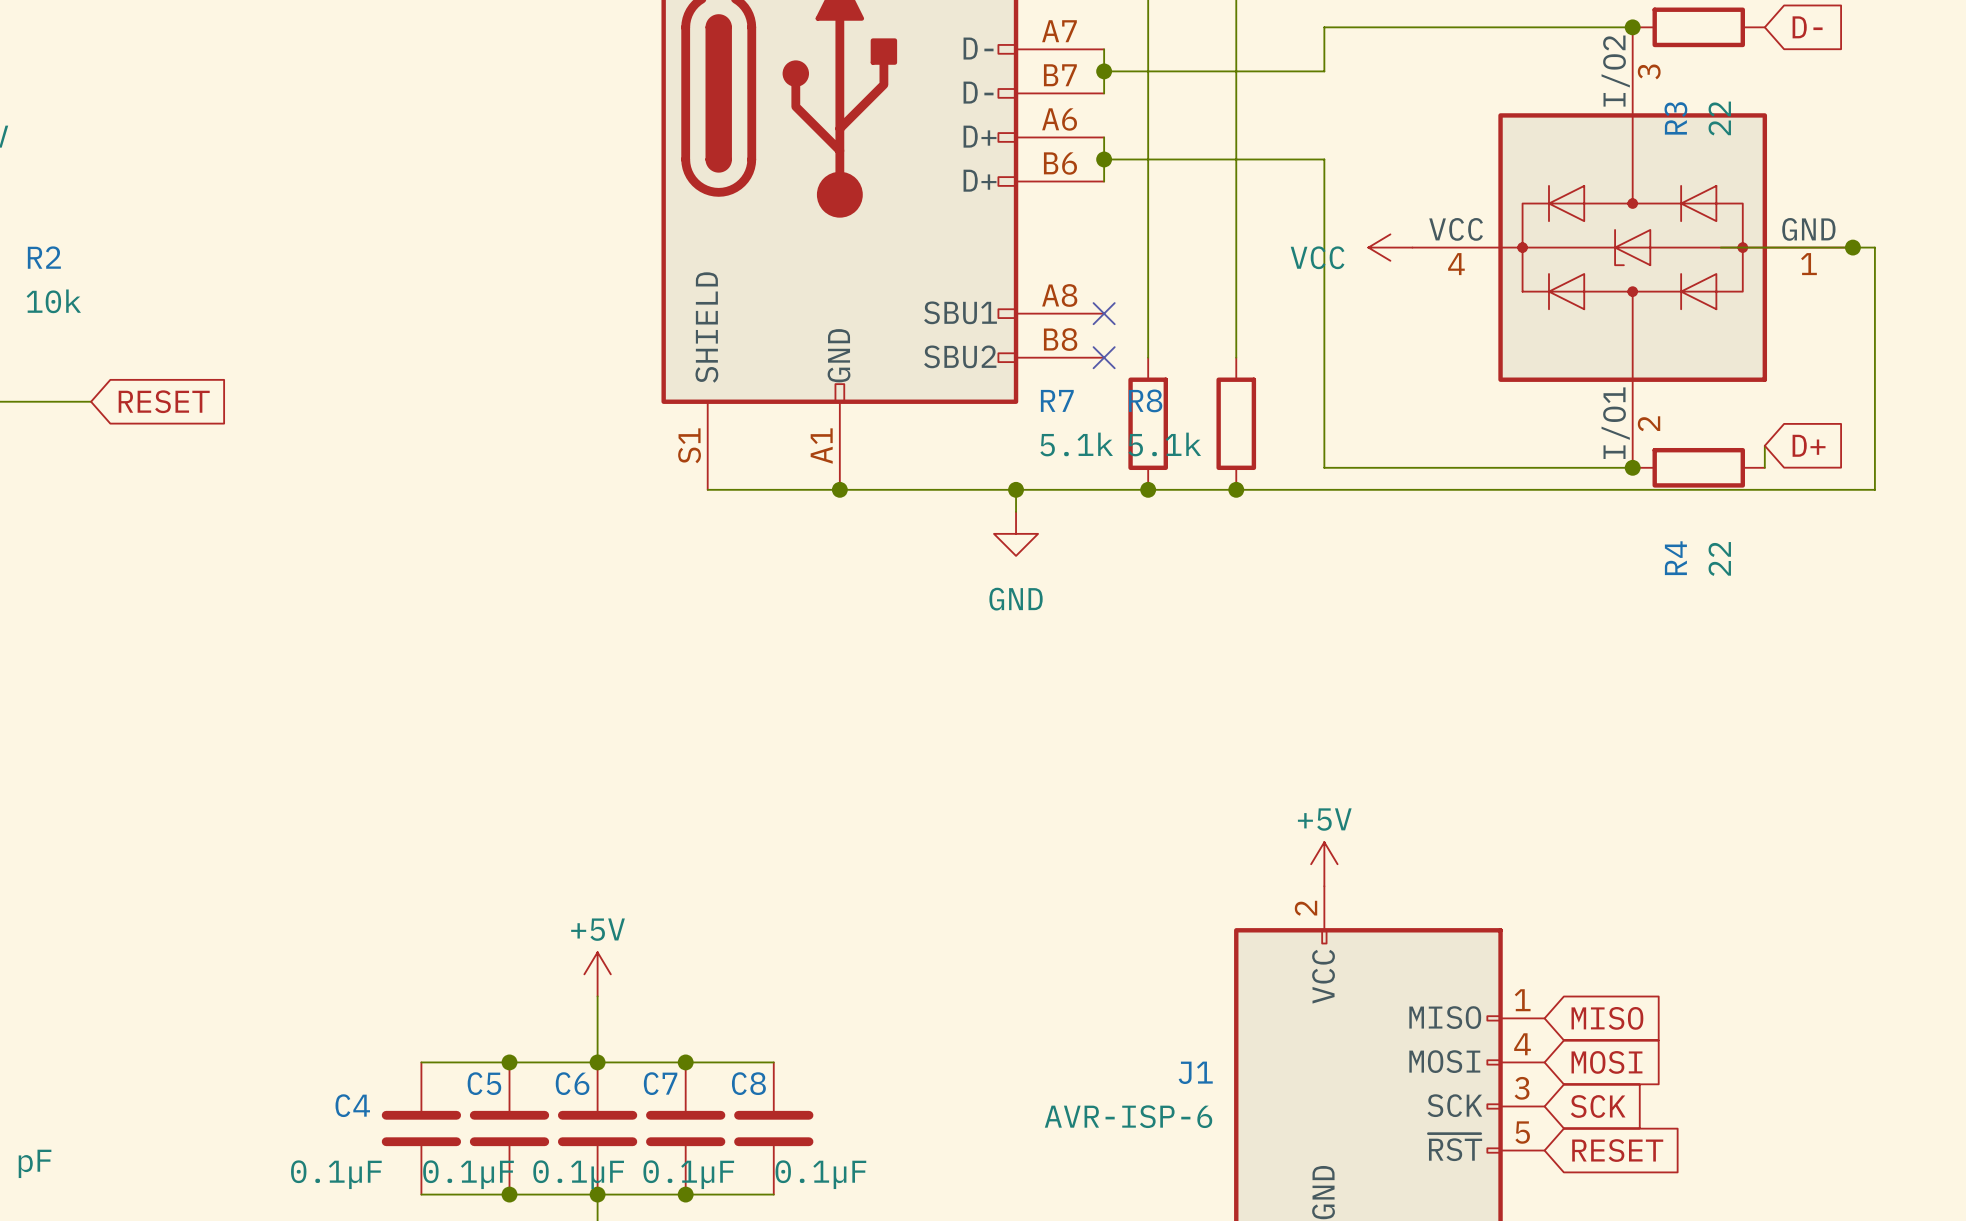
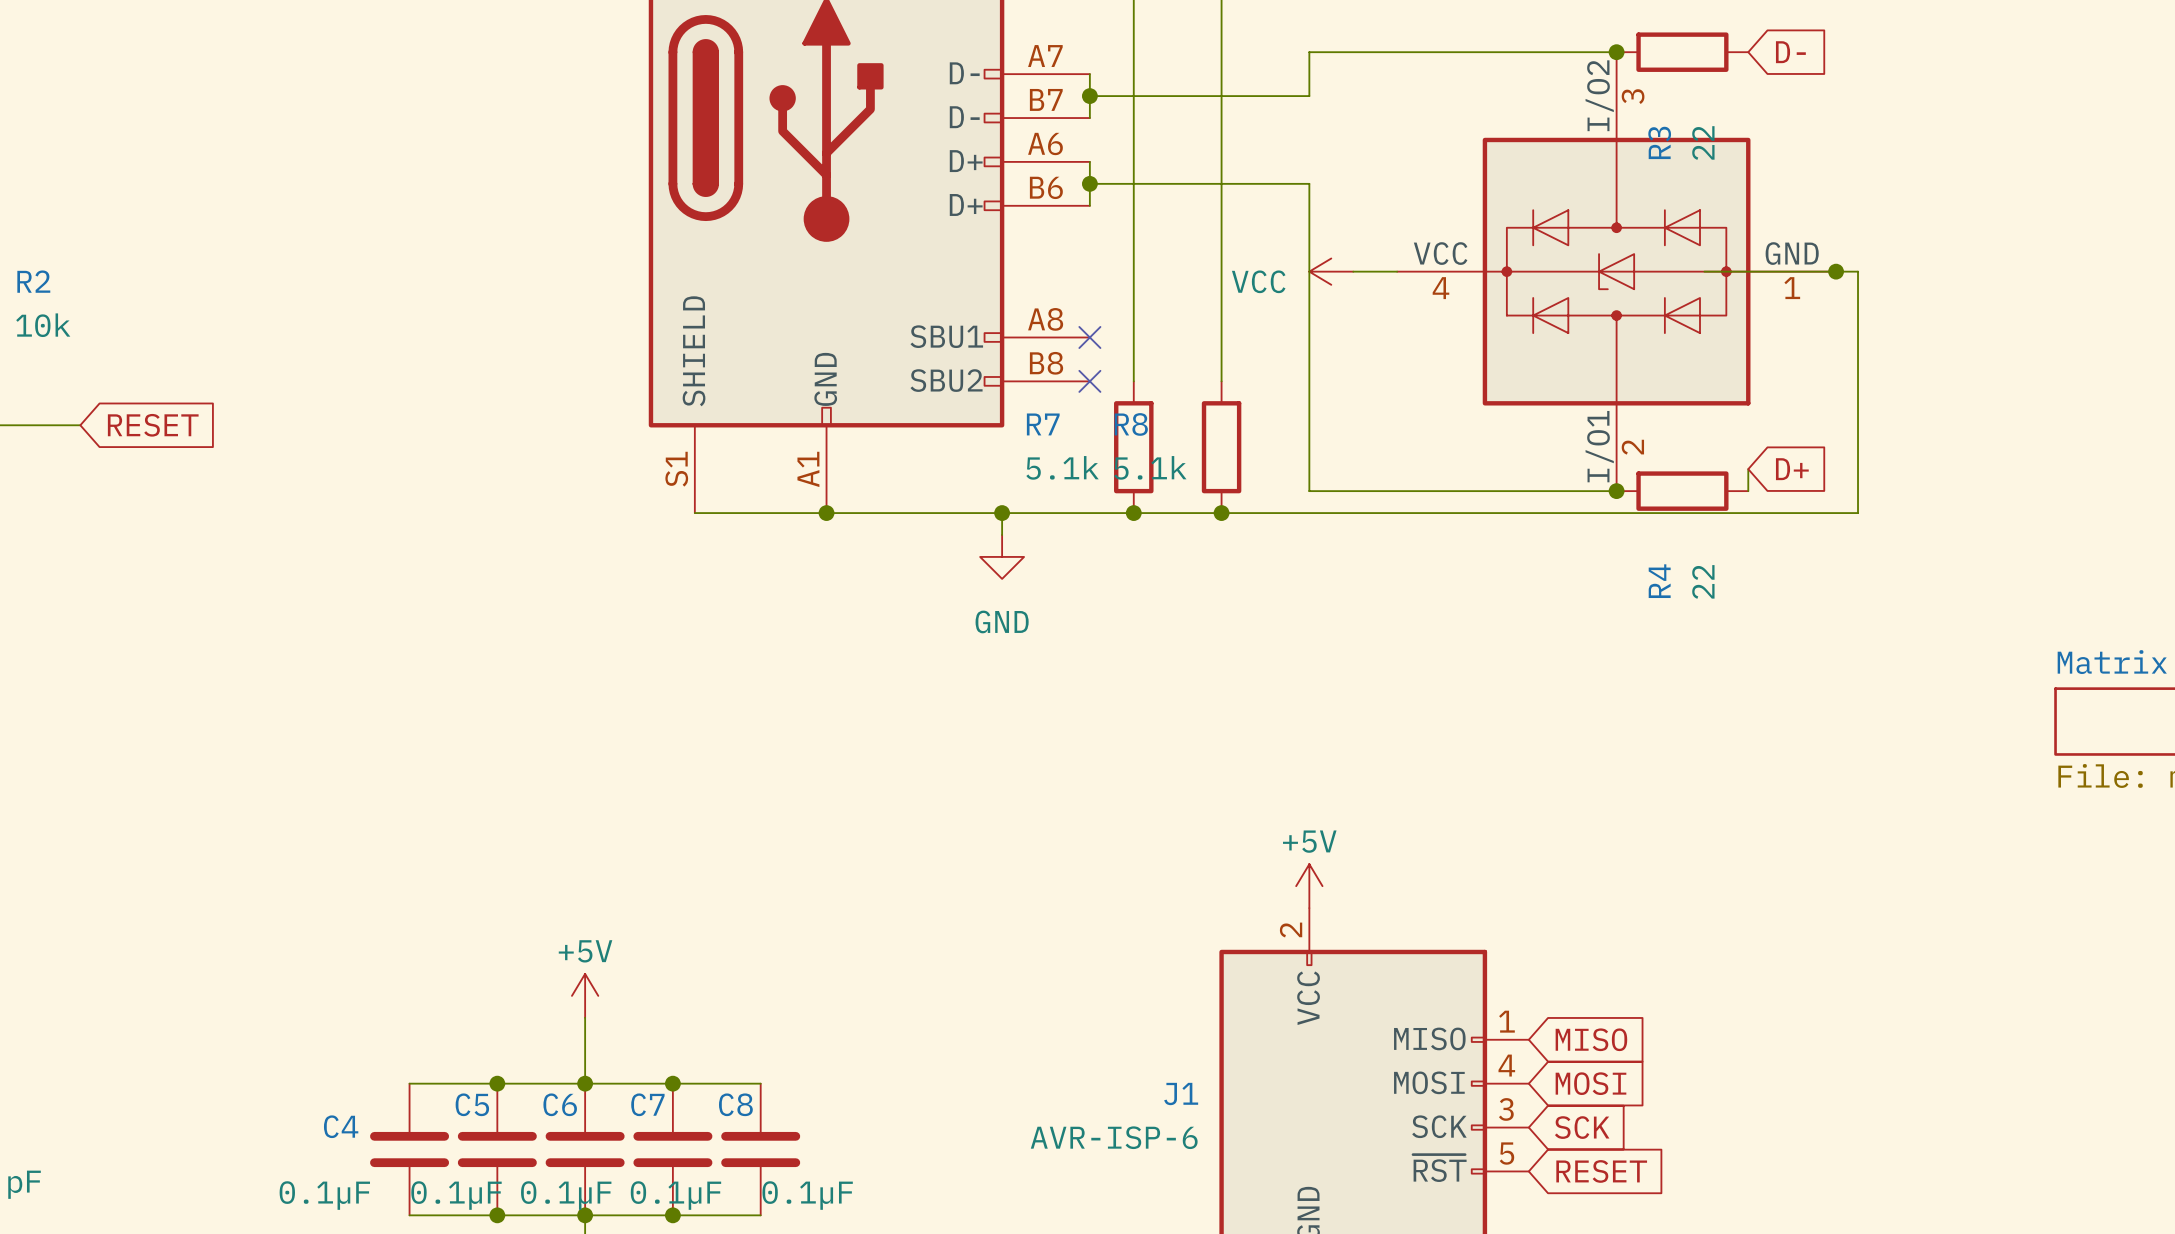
power symbol position: VCC (1390, 247) -> VCC (1331, 271)

